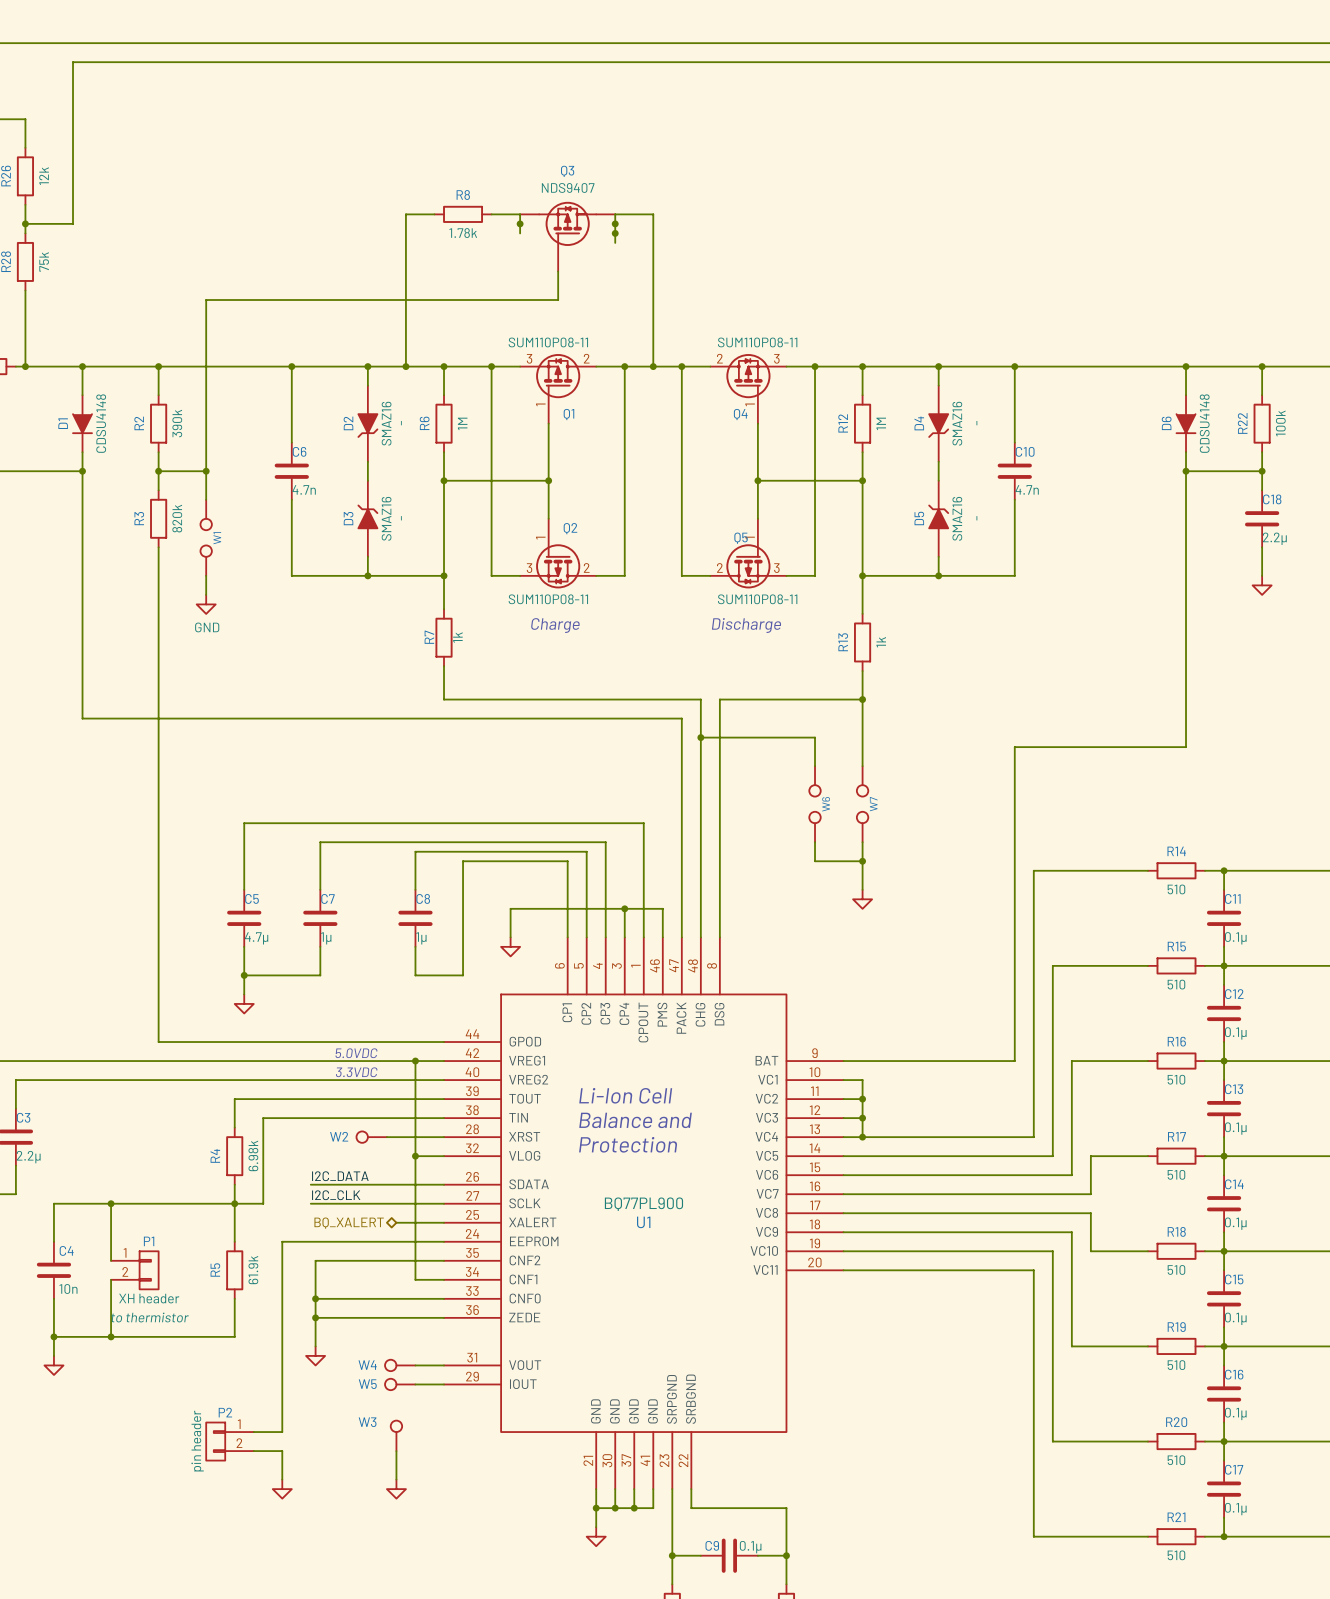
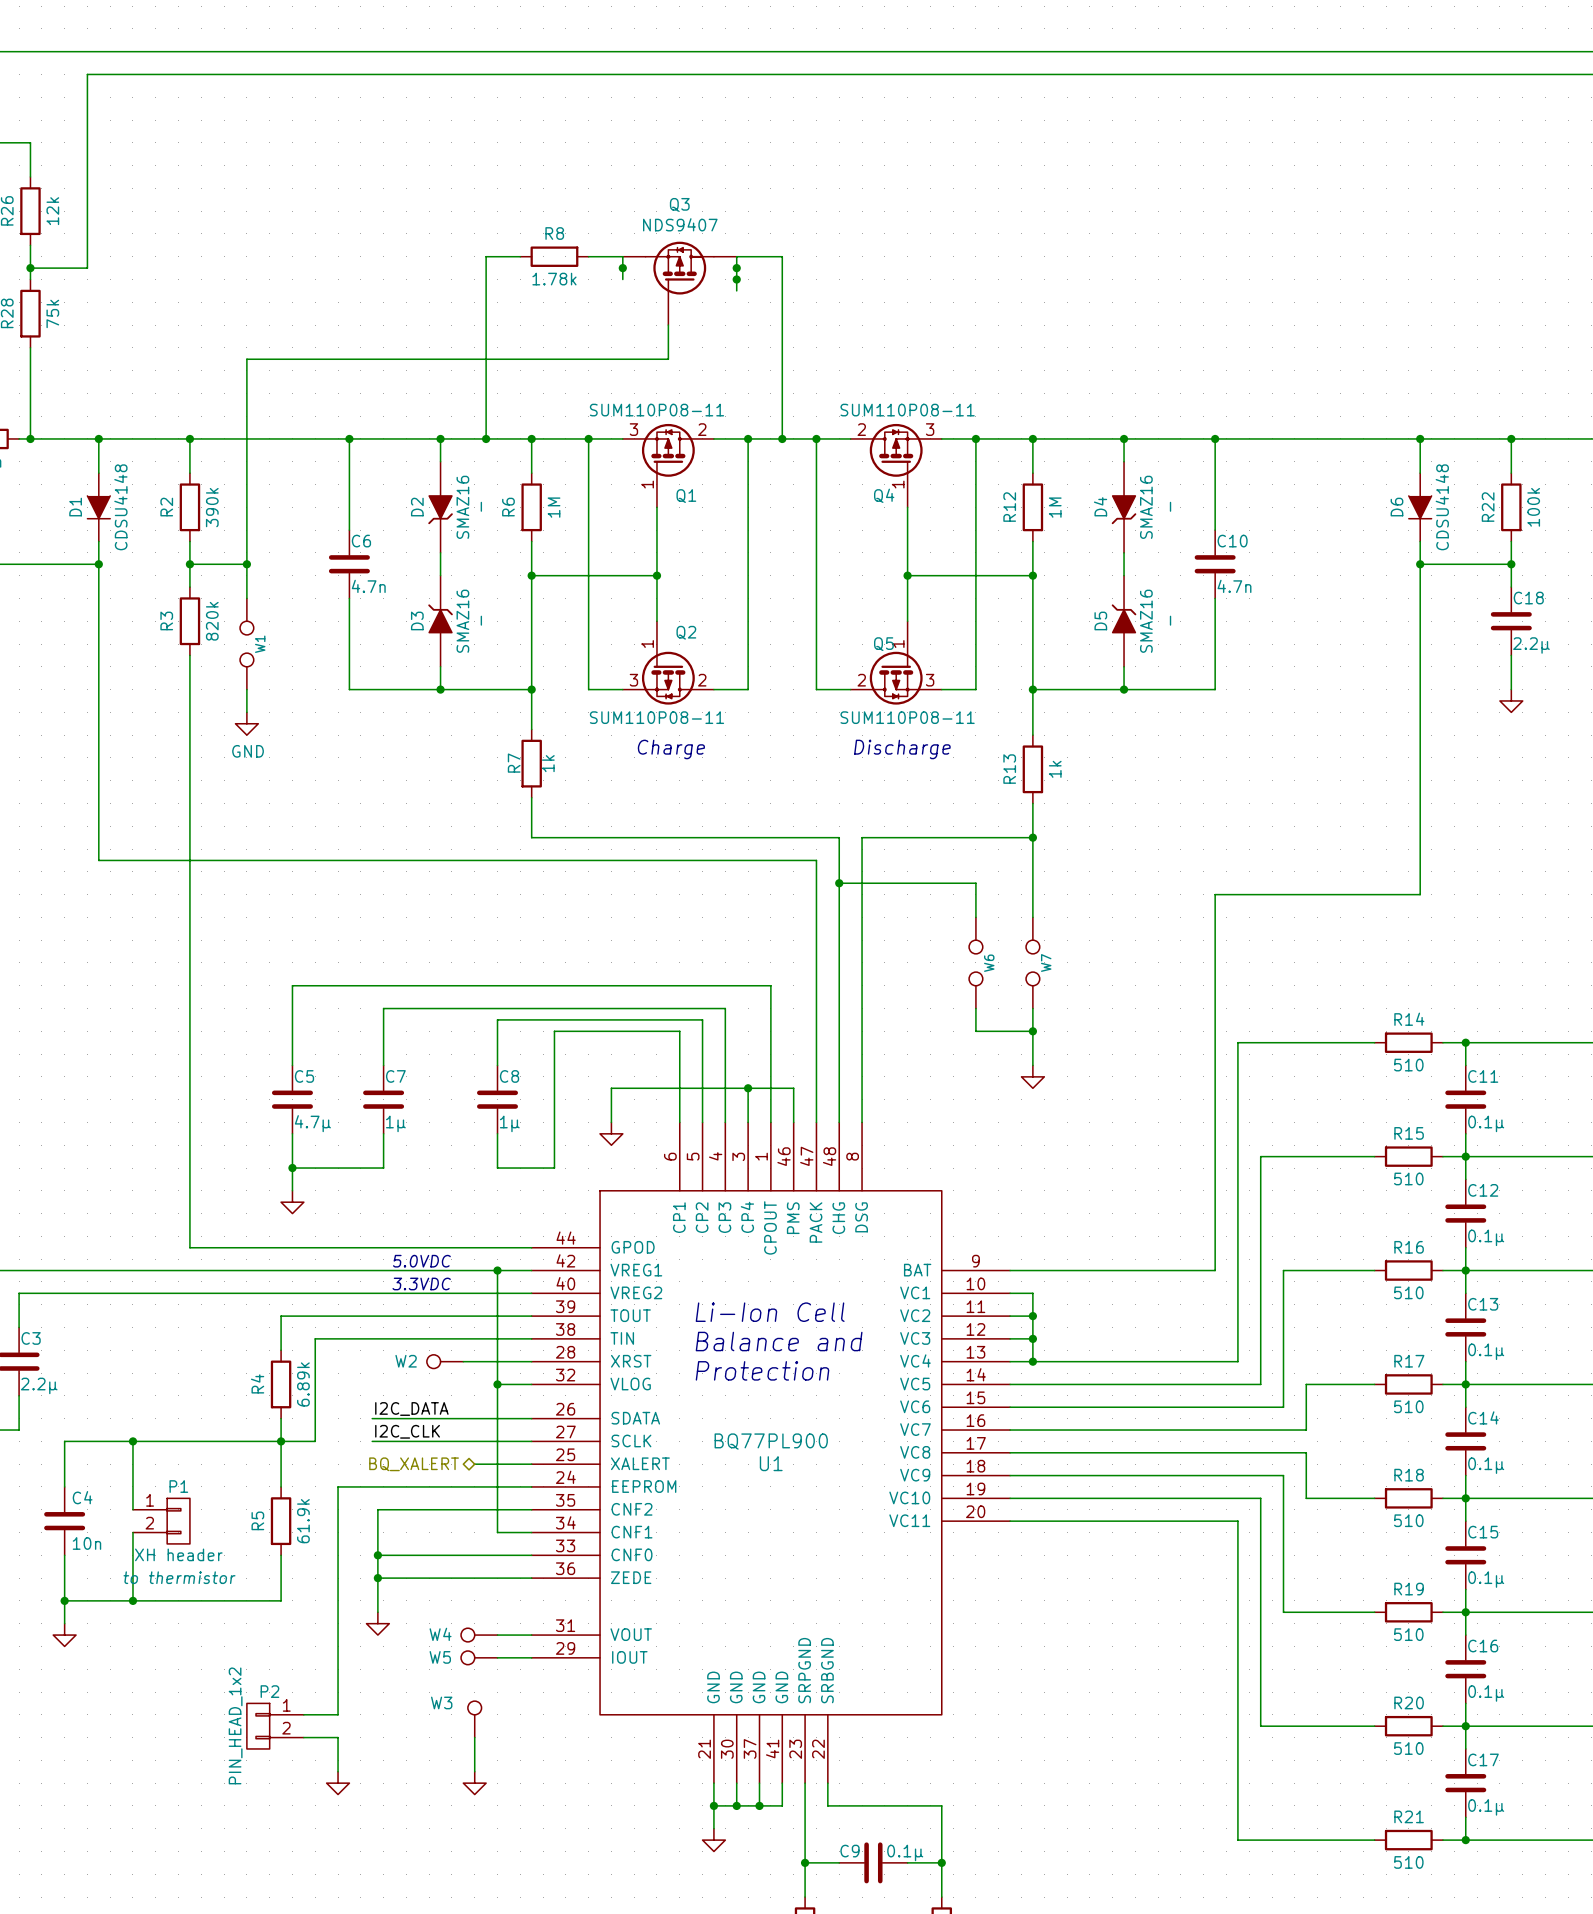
R4 value: 6.98k (253, 1155) -> 6.89k (303, 1384)
P2 value: pin header (197, 1441) -> PIN_HEAD_1x2 (235, 1725)

